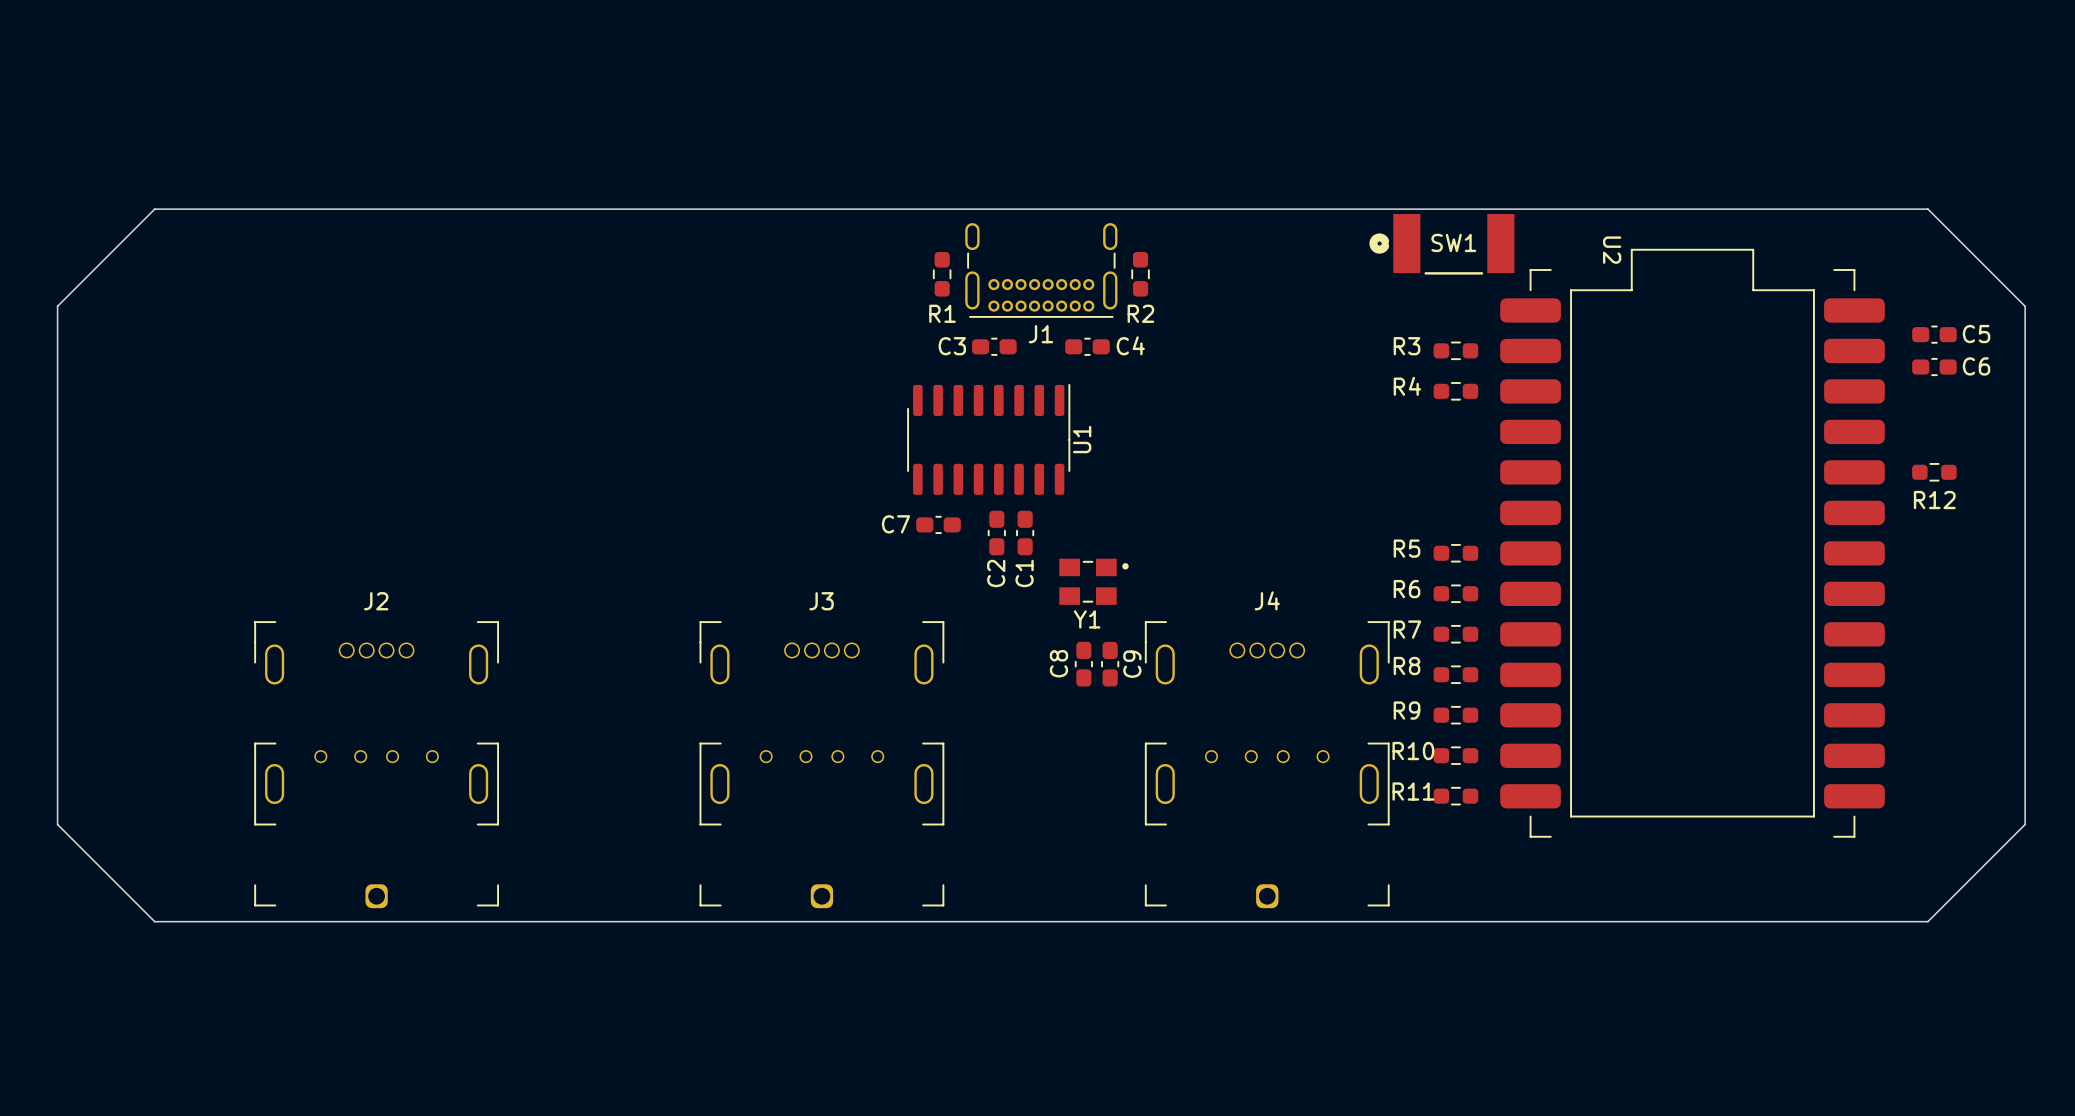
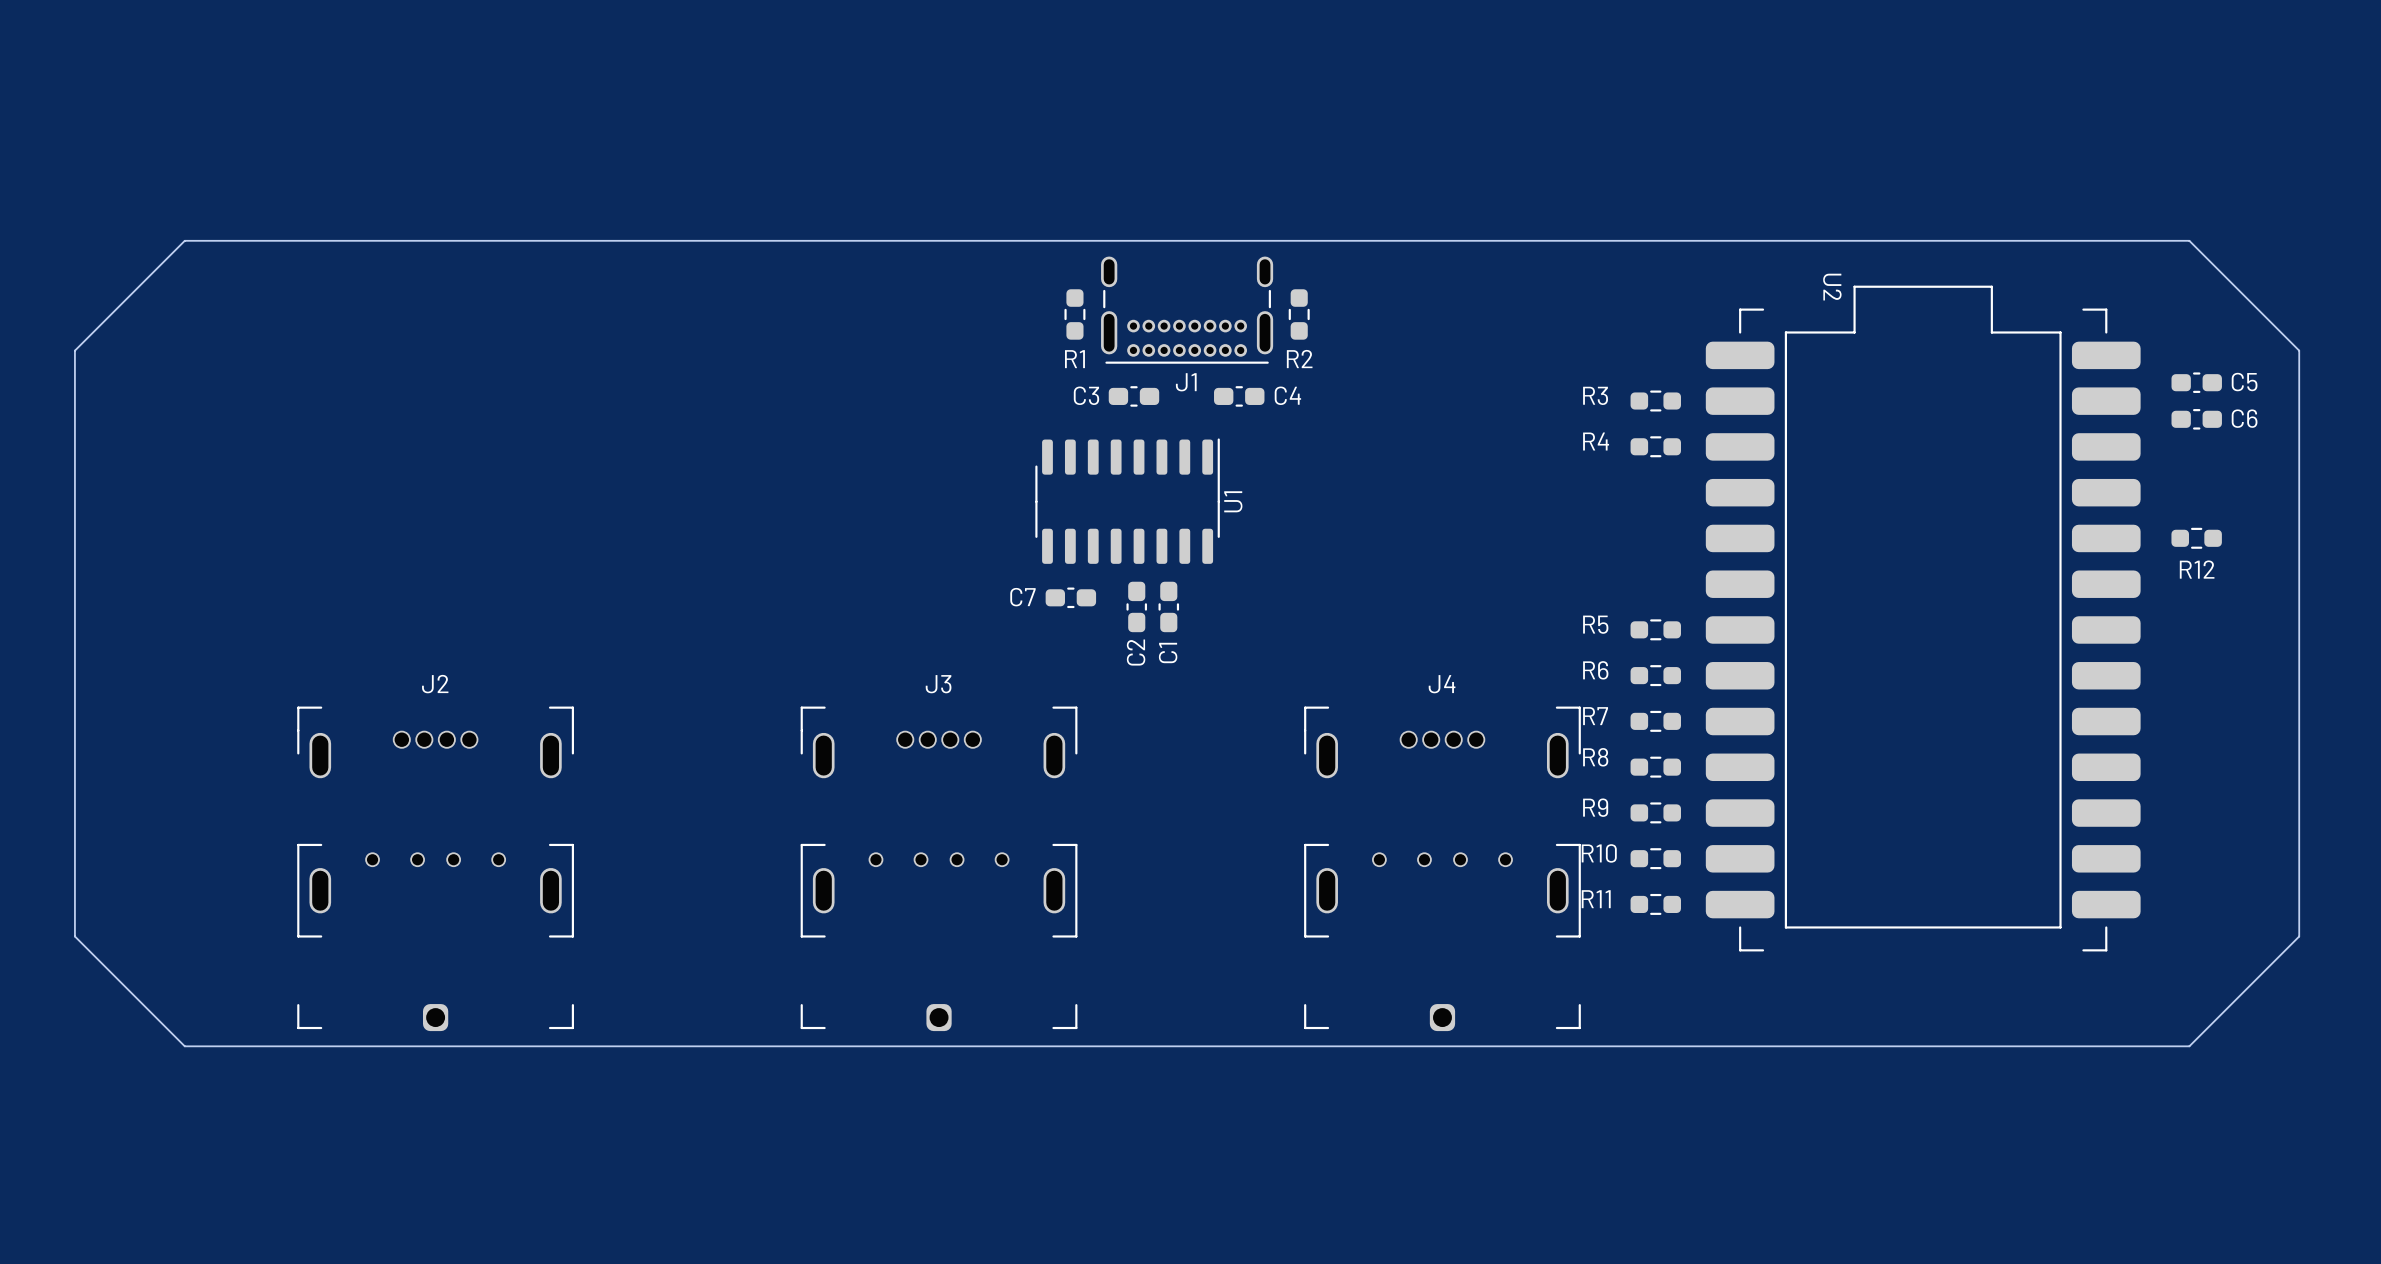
SW1: (1441, 244) -> none
Y1: (1093, 581) -> none
C8: (1083, 664) -> none
C9: (1110, 664) -> none

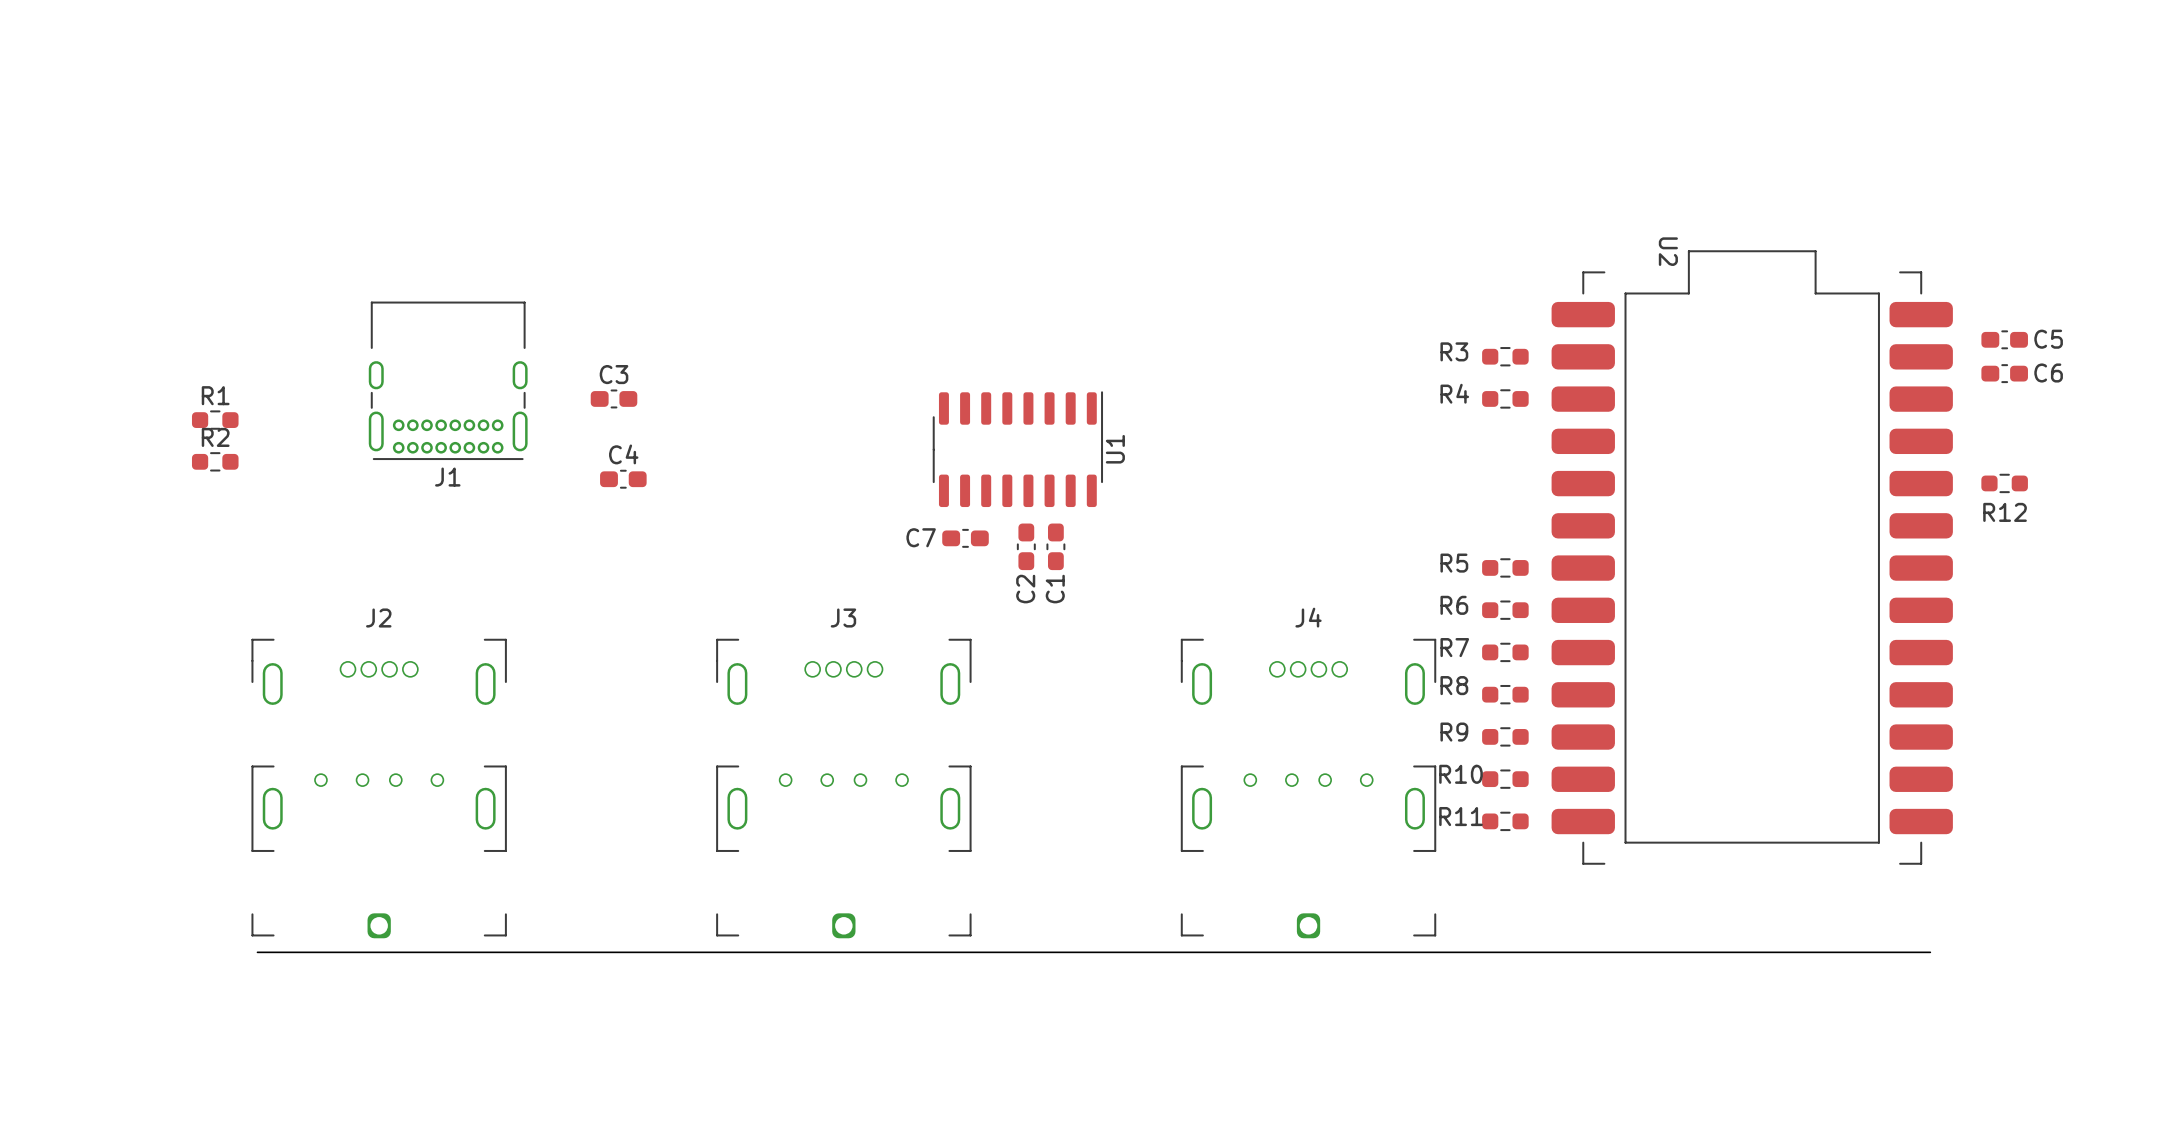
J1 footprint: [1101, 256, 1274, 364] -> [368, 301, 528, 461]
R1 rotation: 0° (1074, 314) -> 90° clockwise (215, 420)
R1 position: (1074, 314) -> (215, 420)
R2 rotation: 0° (1299, 314) -> 90° clockwise (215, 461)
R2 position: (1299, 314) -> (215, 461)
R1 name position: R1 (1074, 359) -> R1 (215, 395)
R2 name position: R2 (1299, 359) -> R2 (215, 437)
C3 name position: C3 (1086, 395) -> C3 (614, 374)
C4 name position: C4 (1287, 395) -> C4 (623, 454)
C3 position: (1133, 396) -> (614, 398)
C4 position: (1239, 396) -> (623, 479)
board edge: (303, 1046) (184, 1046) (74, 936) (74, 350) (184, 240) (2189, 240) (2299, 350) (2299, 936) (2189, 1046) (2116, 1046) -> none

